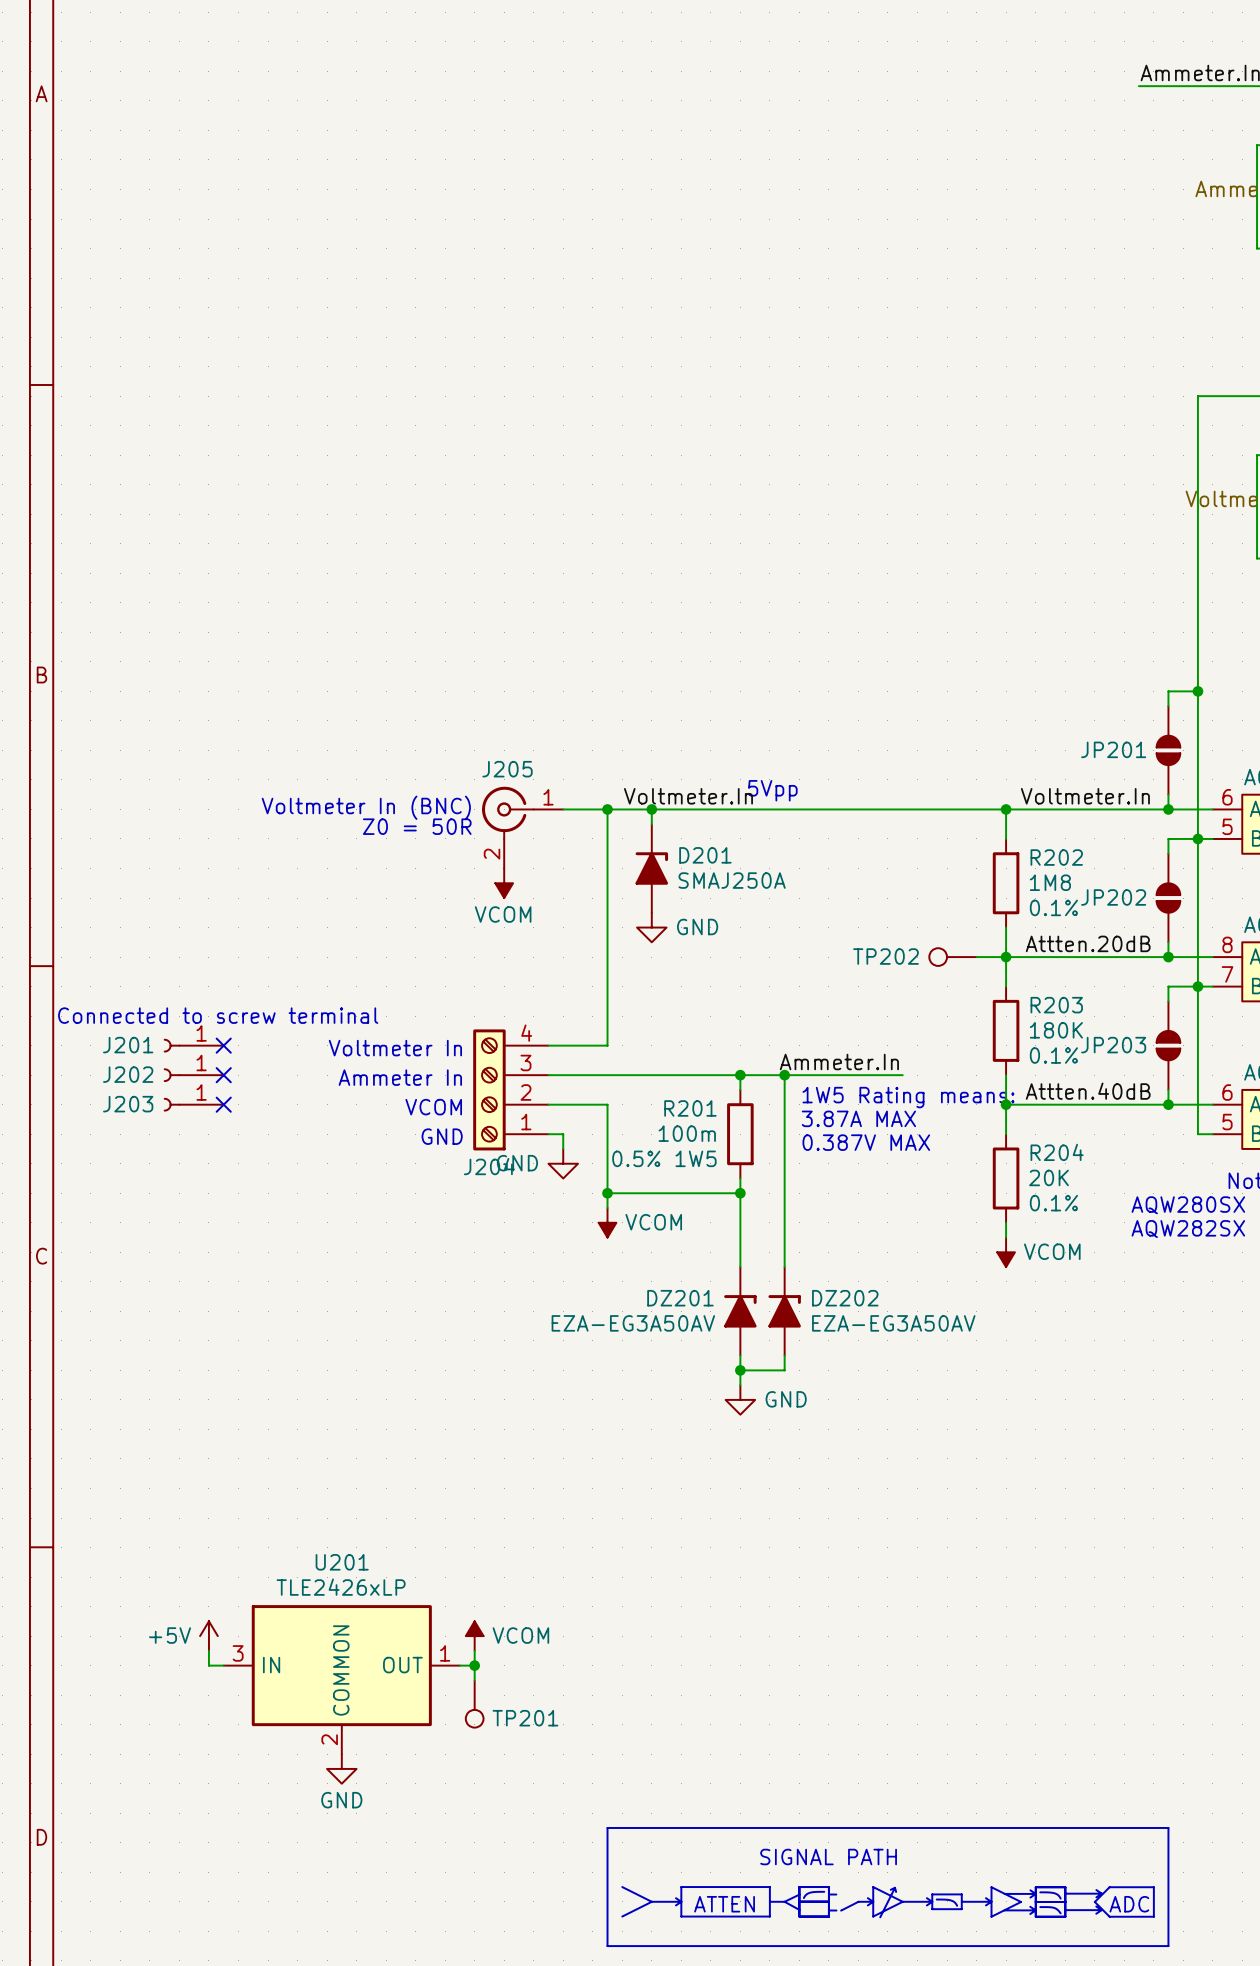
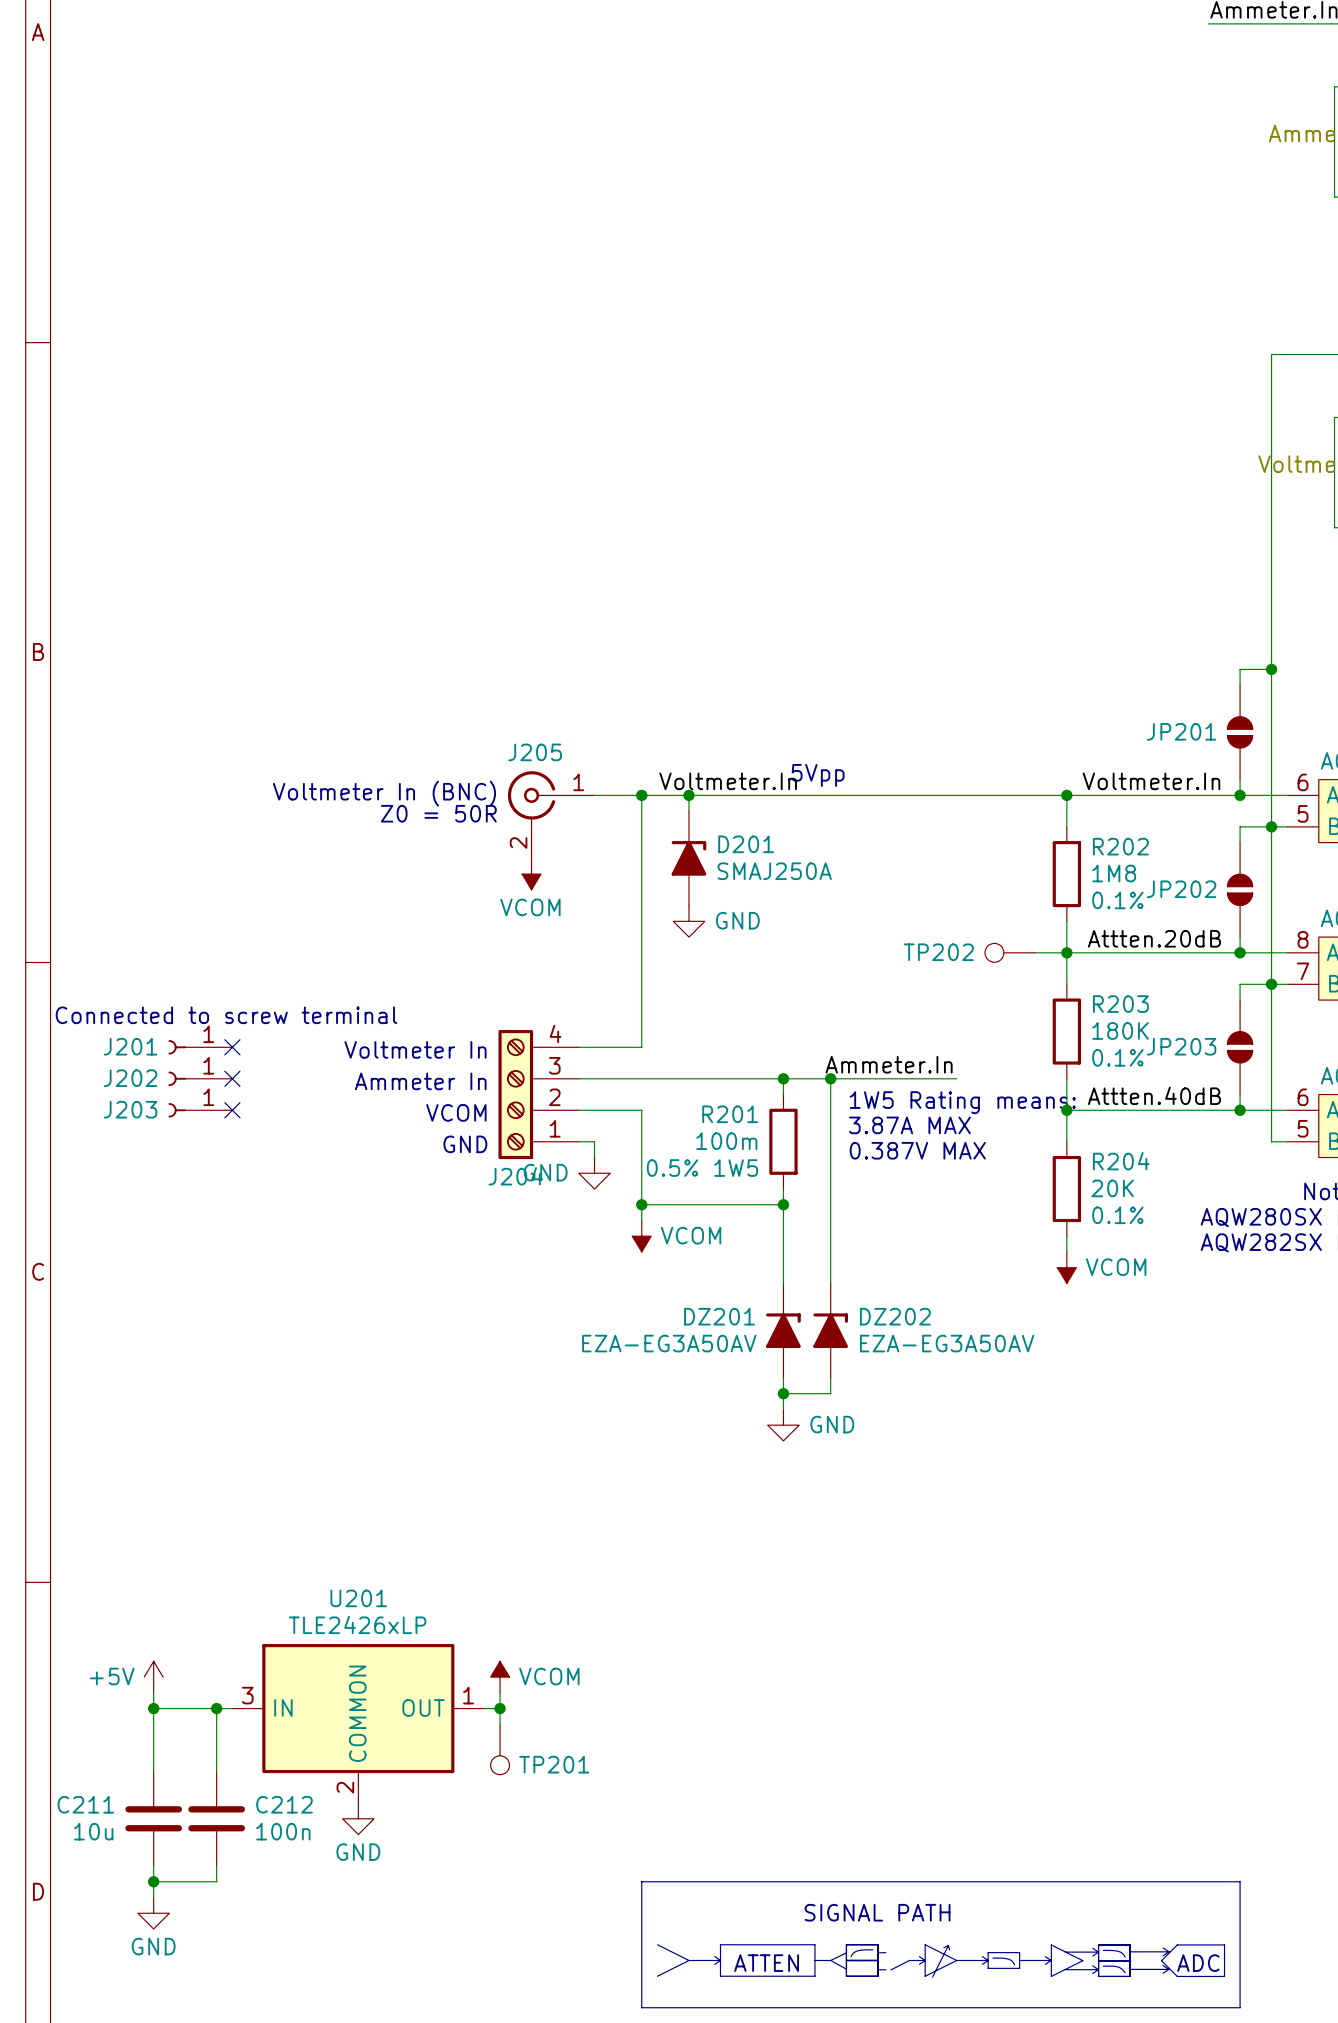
power symbol position: +5V (208, 1636) -> +5V (153, 1677)
wire: none -> (153, 1692) (153, 1771)
wire: (208, 1650) (208, 1665) -> none
wire: none -> (153, 1708) (216, 1708) (216, 1771)
junction: none -> (153, 1708)
junction: none -> (216, 1708)
C211: none -> 10u (153, 1818)
C212: none -> 100n (216, 1818)
wire: none -> (153, 1866) (153, 1897)
wire: none -> (216, 1866) (216, 1881) (153, 1881)
junction: none -> (153, 1881)
power symbol: none -> GND (153, 1913)

